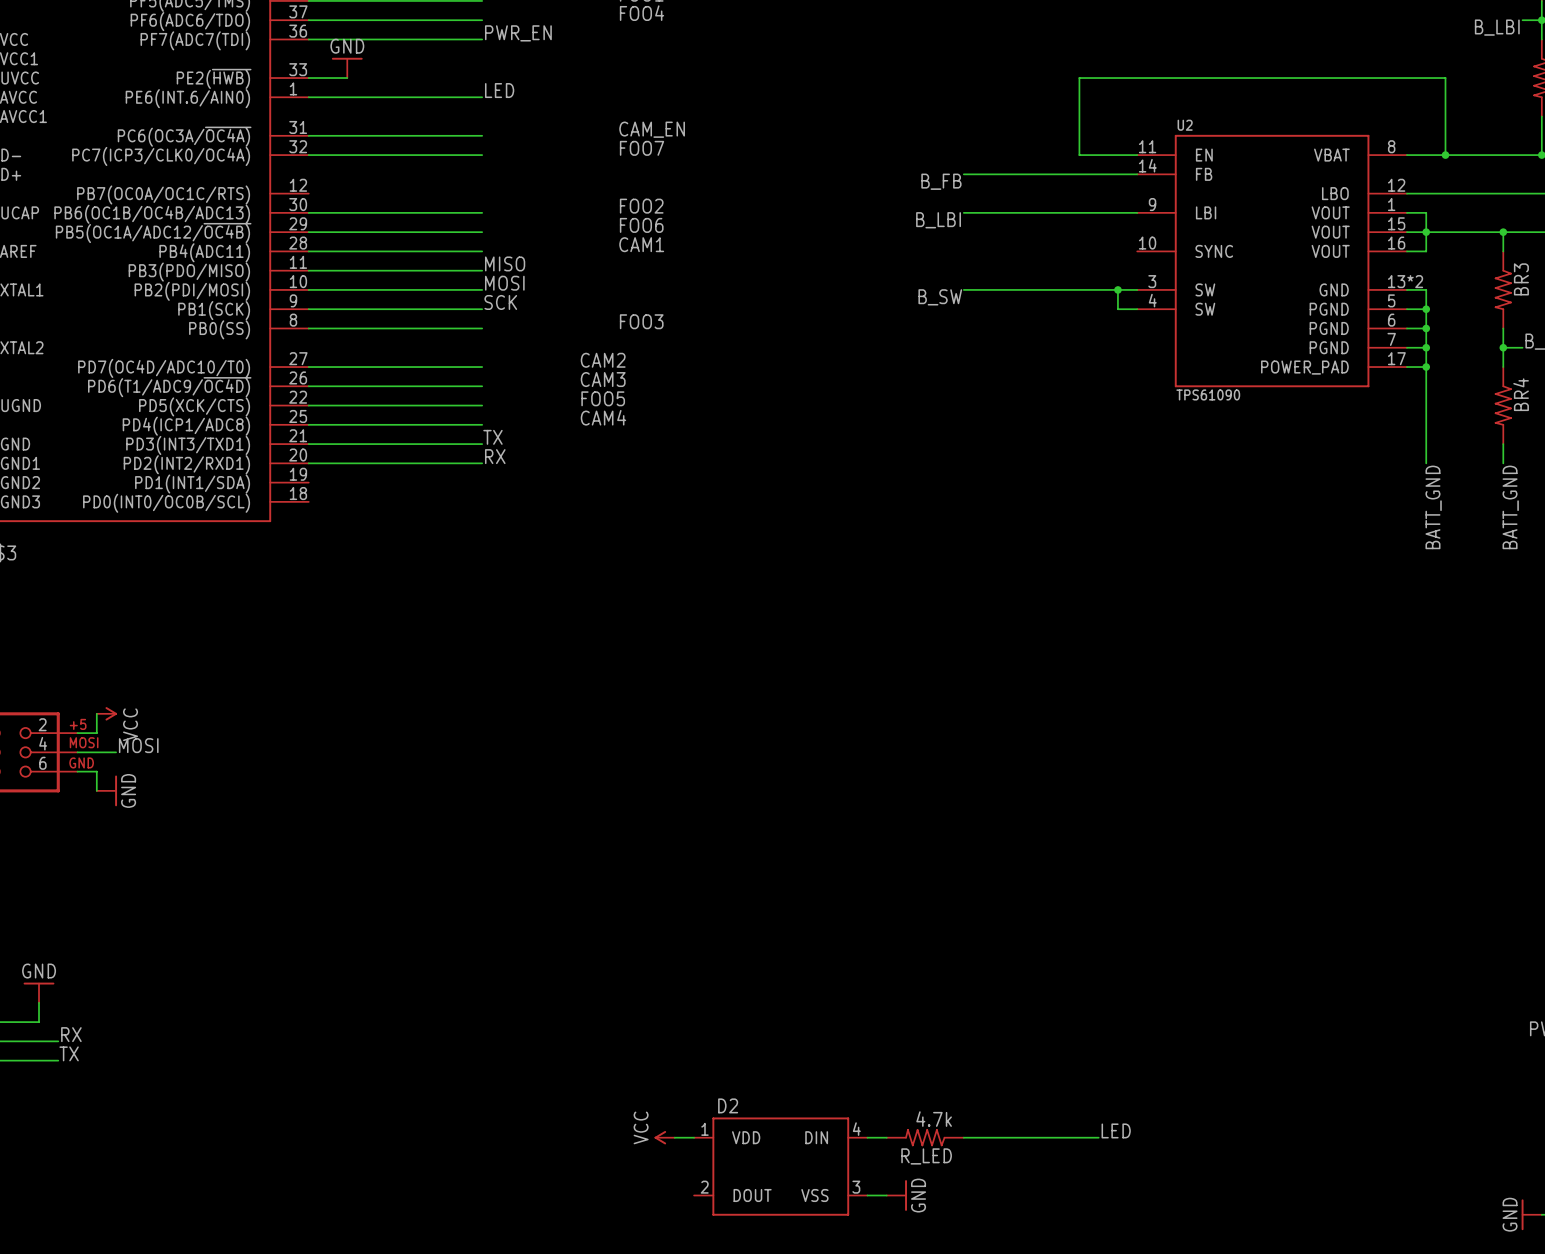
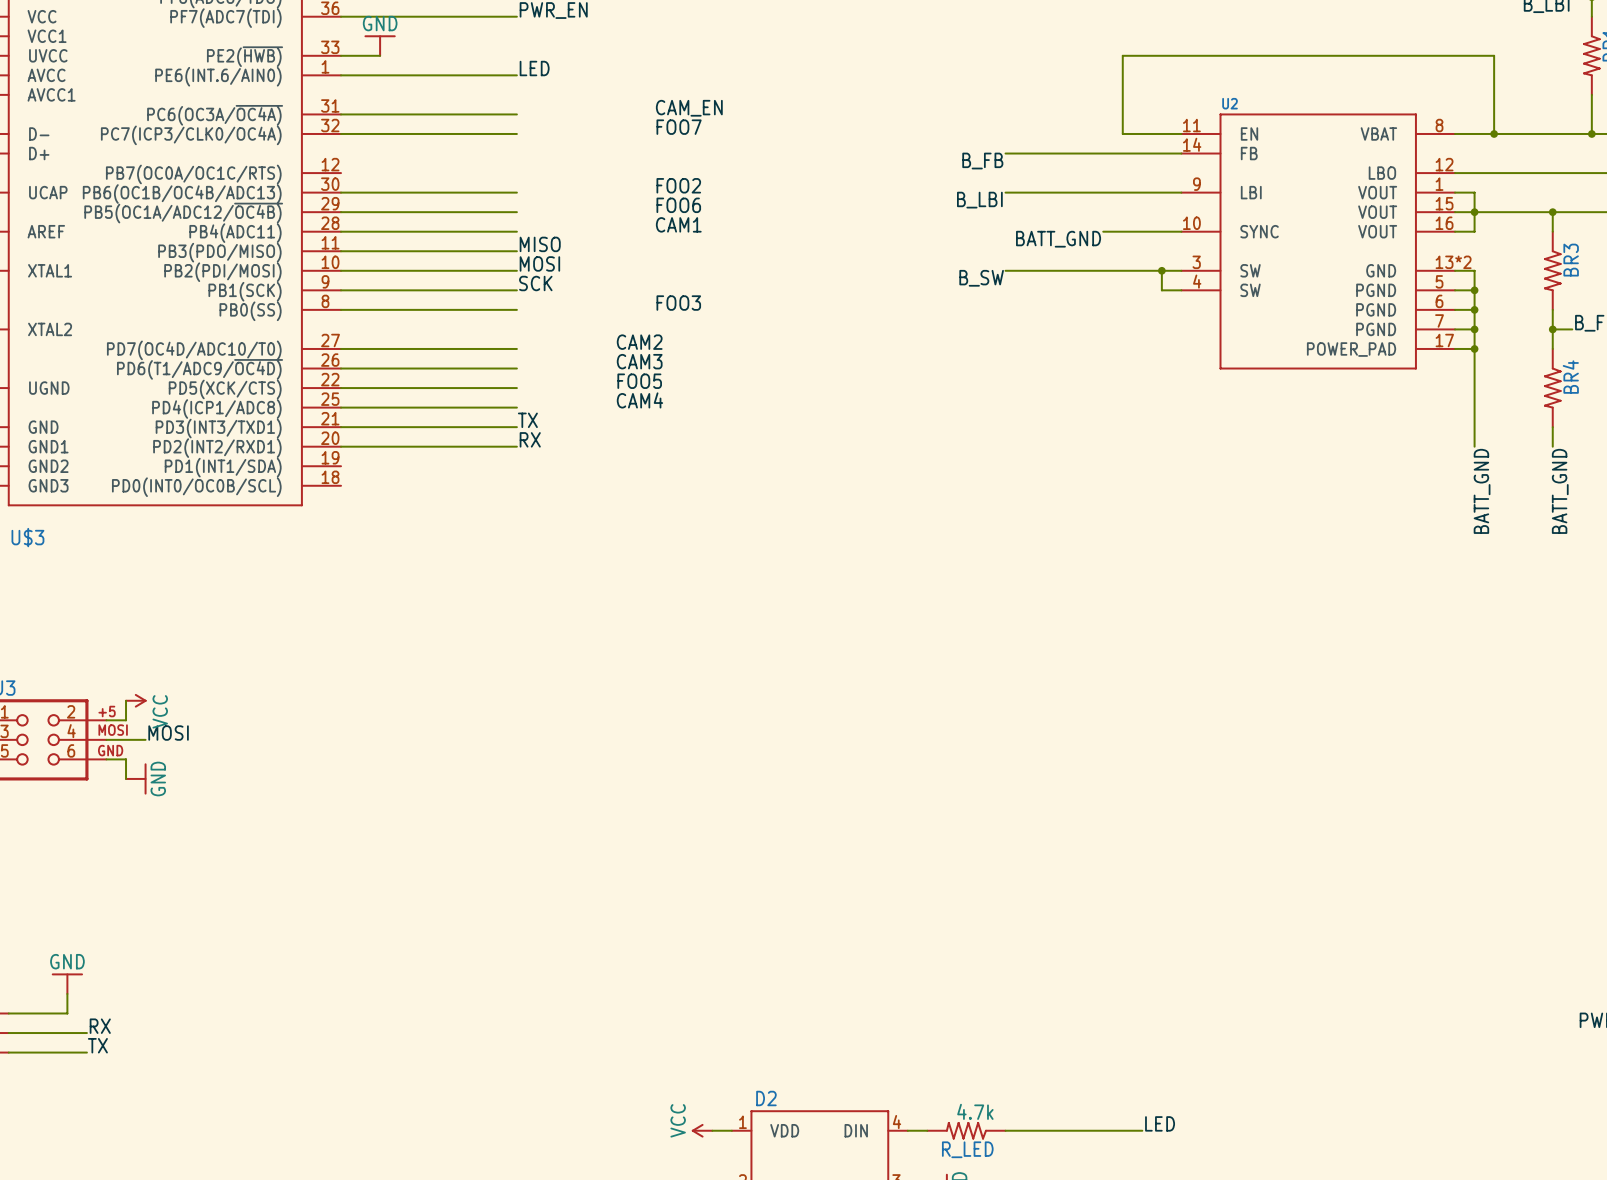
wire: none -> (1103, 231) (1181, 231)
label: none -> BATT_GND (1058, 239)
U2 value: TPS61090 (1208, 394) -> none

